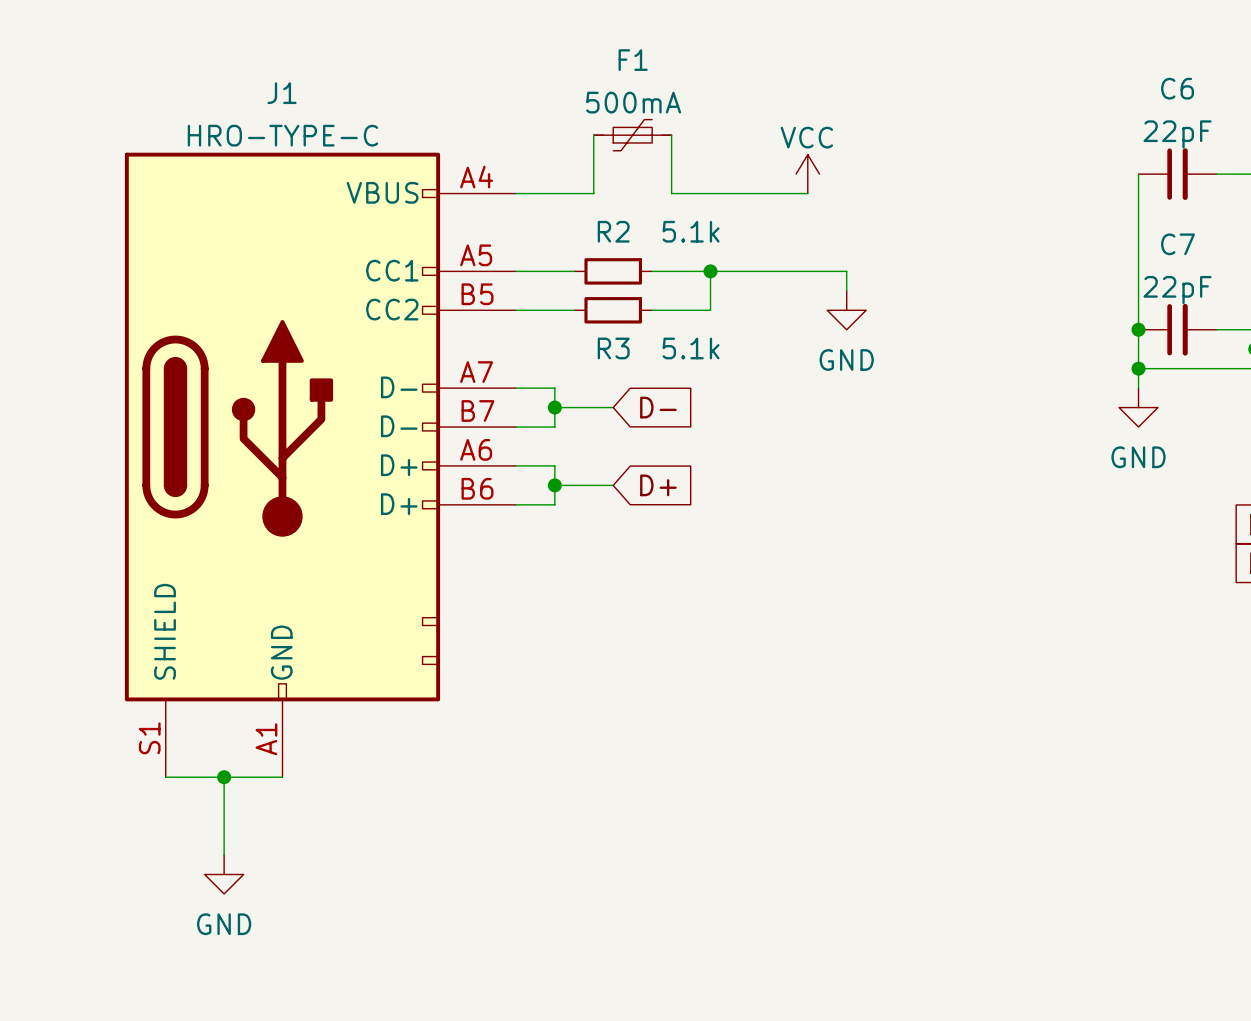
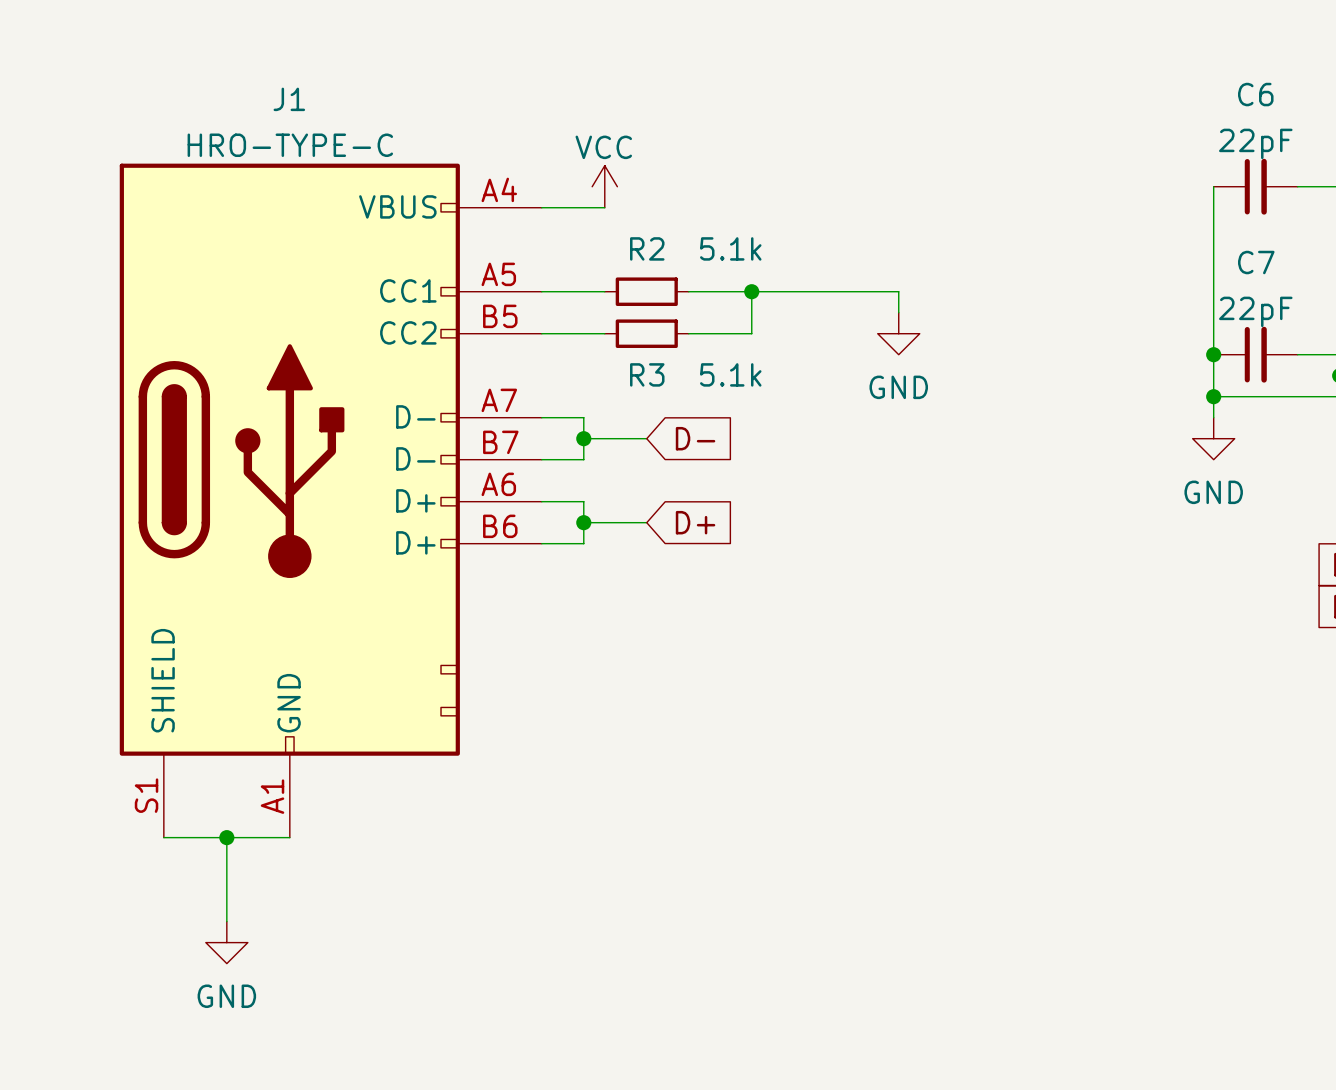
wire: (593, 135) (593, 193) (574, 193) -> none
F1: 500mA (632, 135) -> none
wire: (671, 135) (671, 193) (807, 193) -> none
power symbol position: VCC (807, 174) -> VCC (604, 186)

